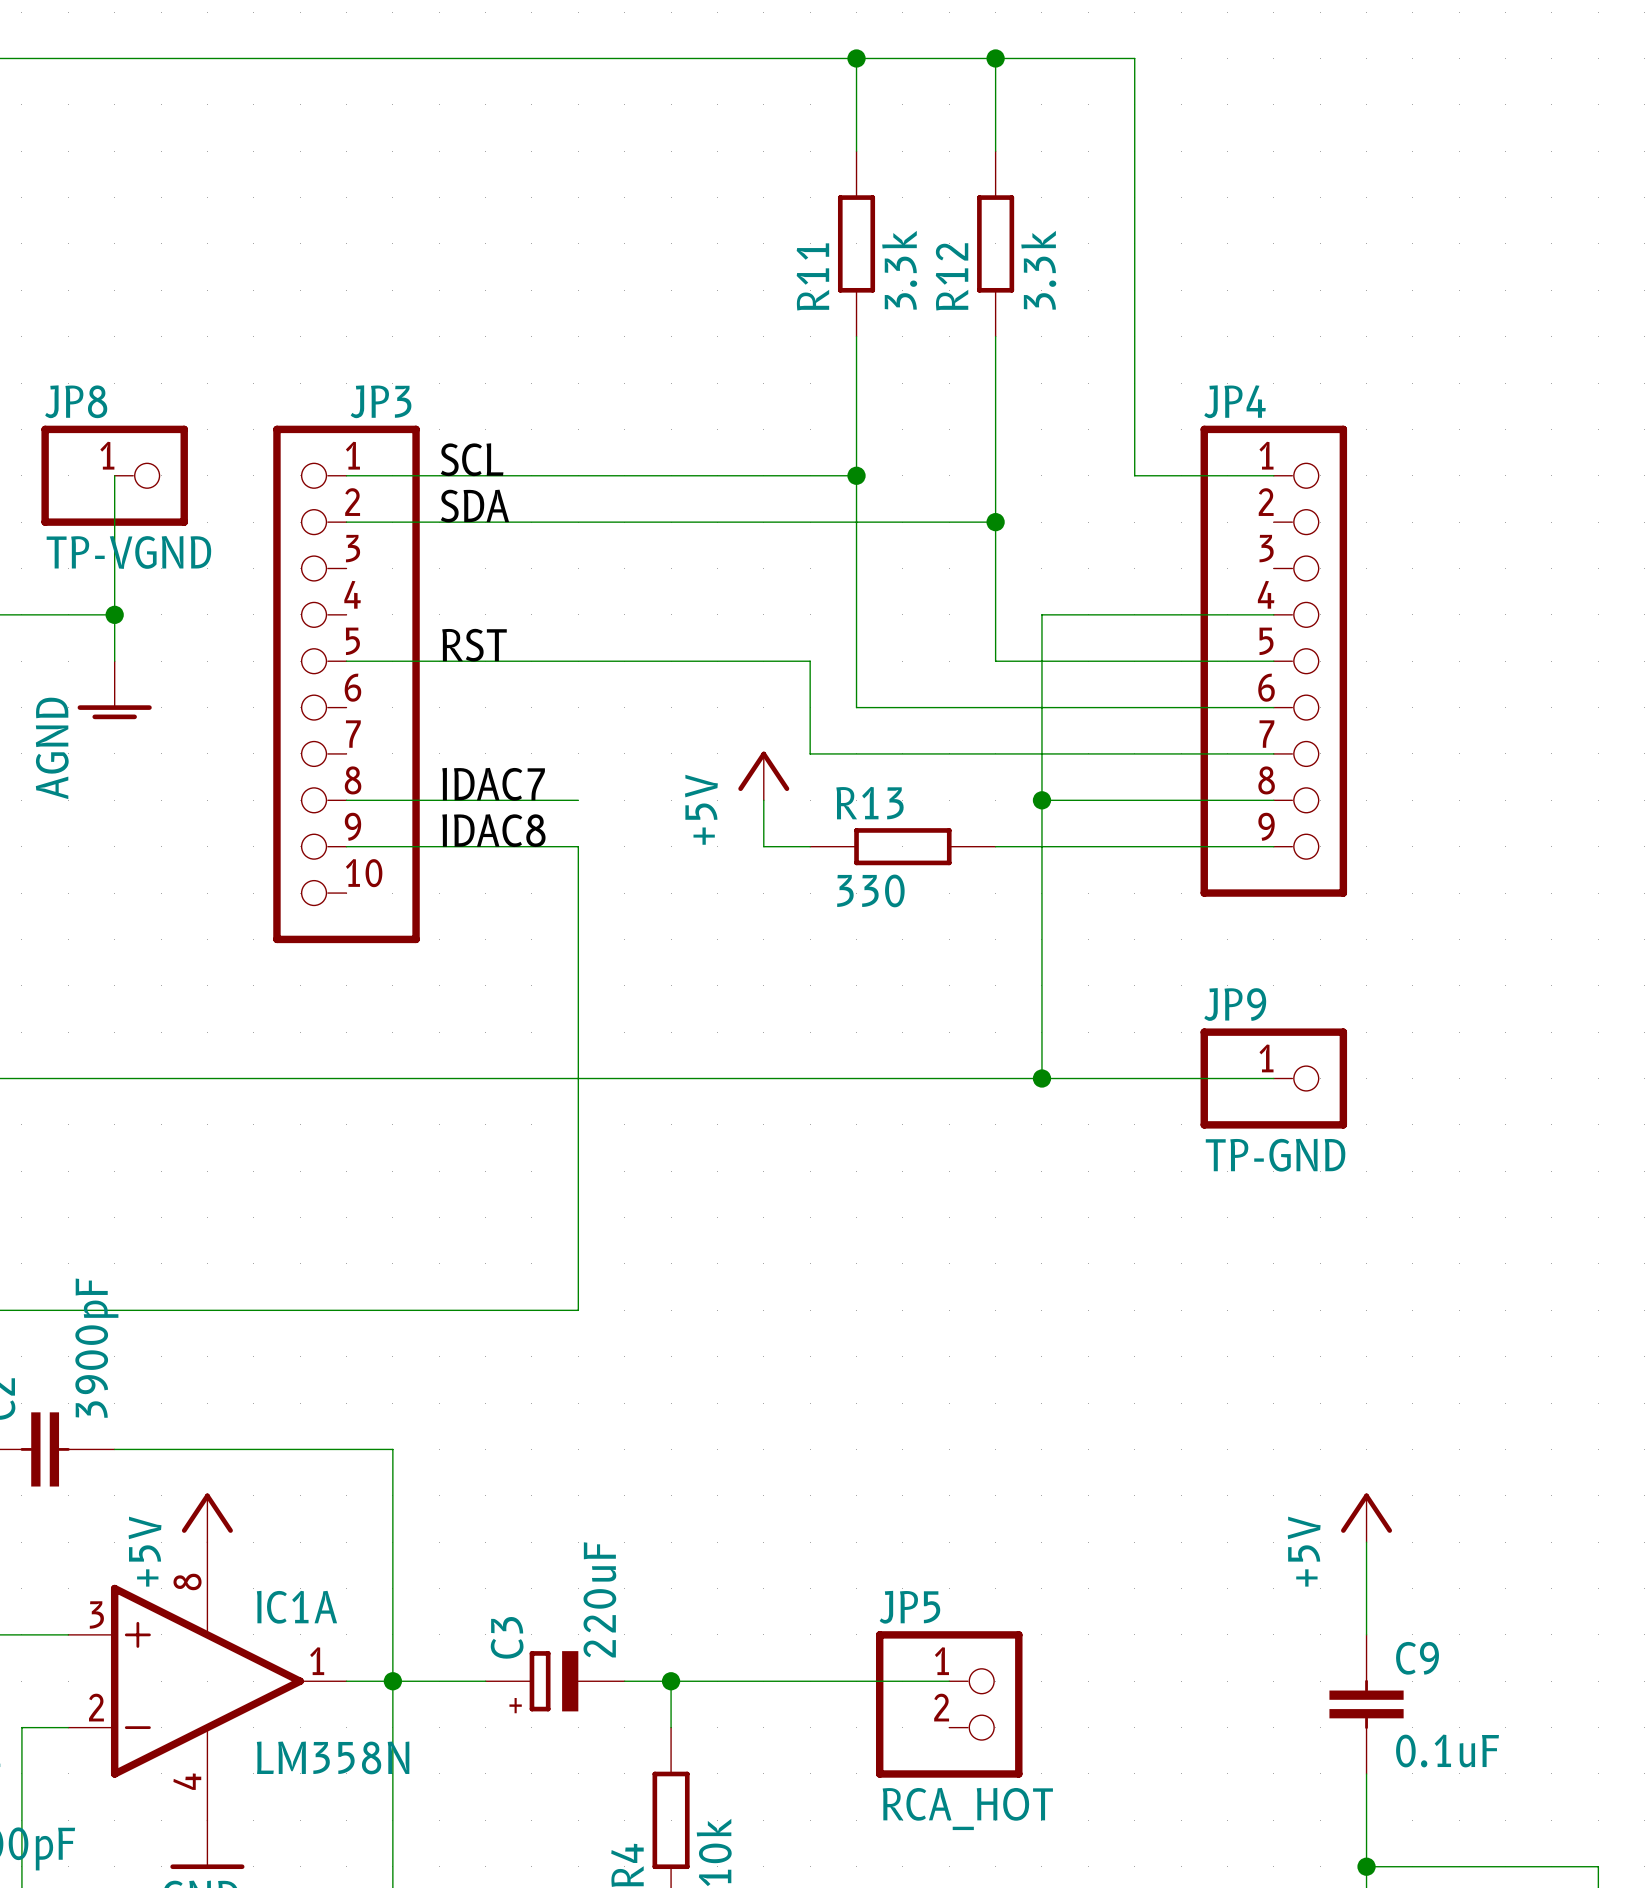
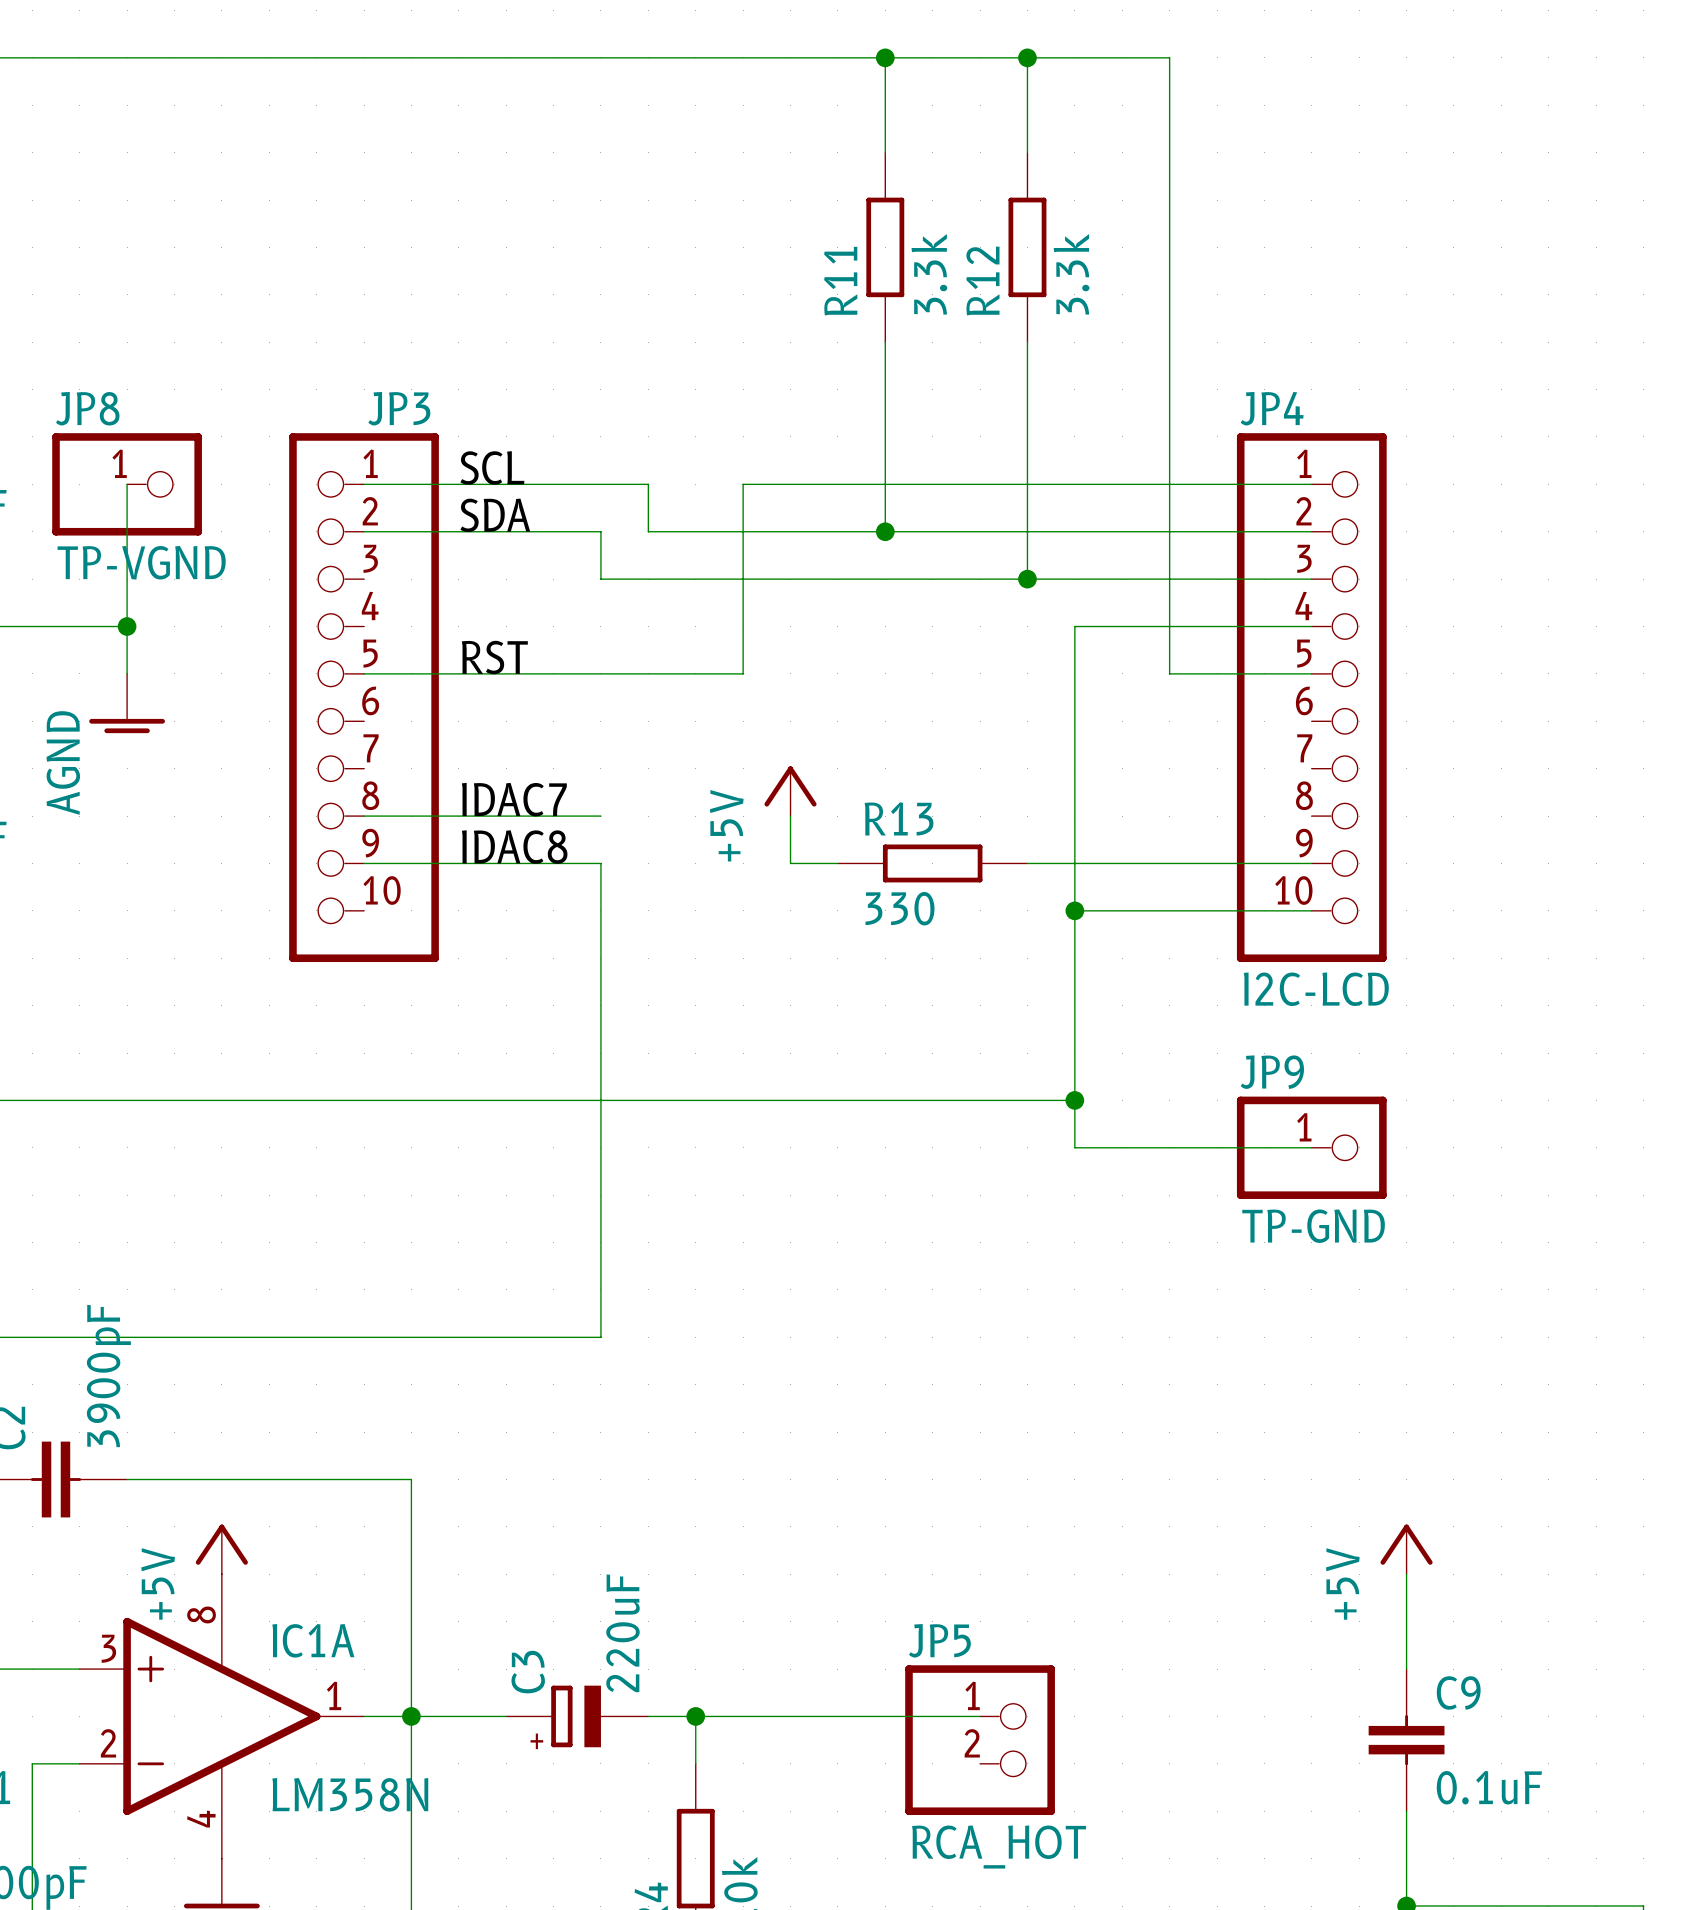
JP4 symbol: [1200, 425, 1348, 897] -> [1236, 433, 1387, 963]
wire: (624, 475) (717, 475) -> (743, 673) (743, 484)
junction position: (856, 475) -> (885, 531)
wire: (578, 522) (624, 522) -> (648, 484) (648, 531)
wire: none -> (600, 531) (600, 579) (1311, 579)
wire: (856, 522) (856, 707) (1273, 707) -> none
wire: none -> (1027, 531) (1311, 531)
junction position: (995, 522) -> (1027, 579)
wire: (995, 568) (995, 661) (1134, 661) -> (885, 484) (1169, 484) (1169, 673)
wire: (717, 661) (810, 661) (810, 753) (1273, 753) -> none
wire: (1041, 800) (1273, 800) -> (1074, 910) (1311, 910)
junction position: (1041, 800) -> (1074, 910)
JP4 value: none -> I2C-LCD (1316, 989)
wire: (1041, 1078) (1273, 1078) -> (1074, 1100) (1074, 1147) (1311, 1147)
JP9 position: (1273, 1078) -> (1311, 1147)

